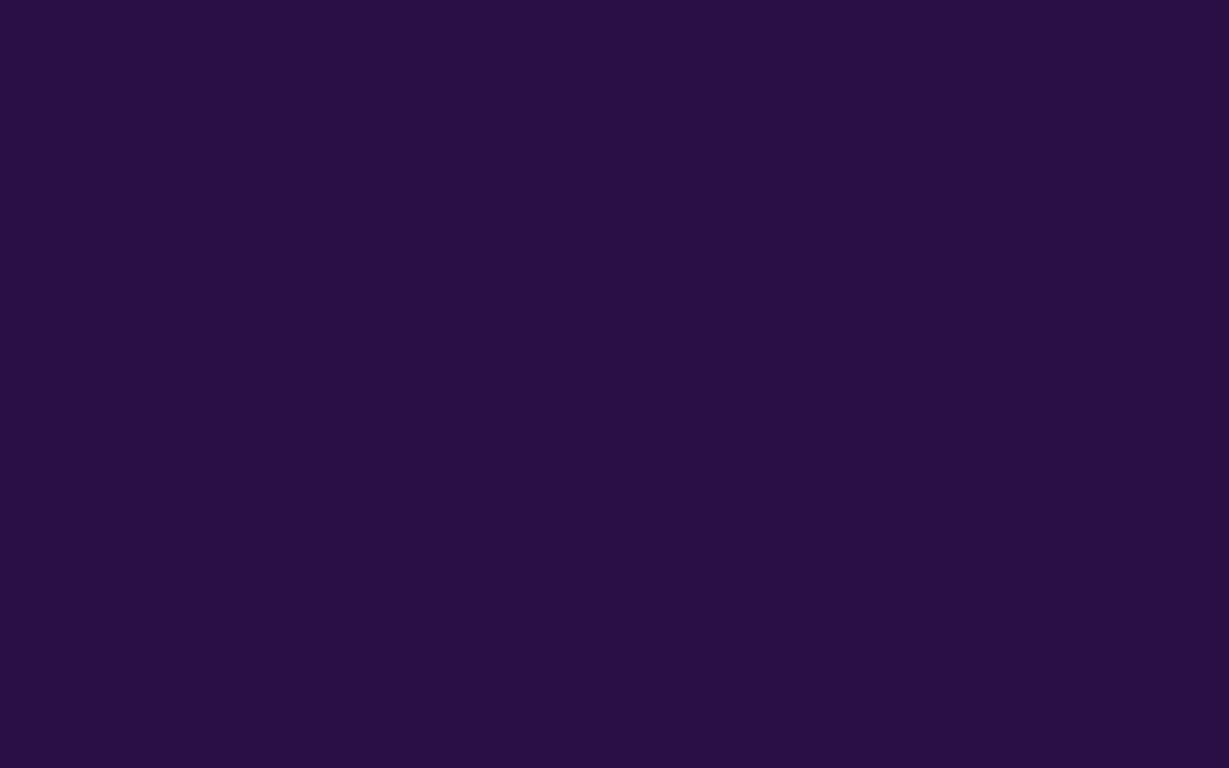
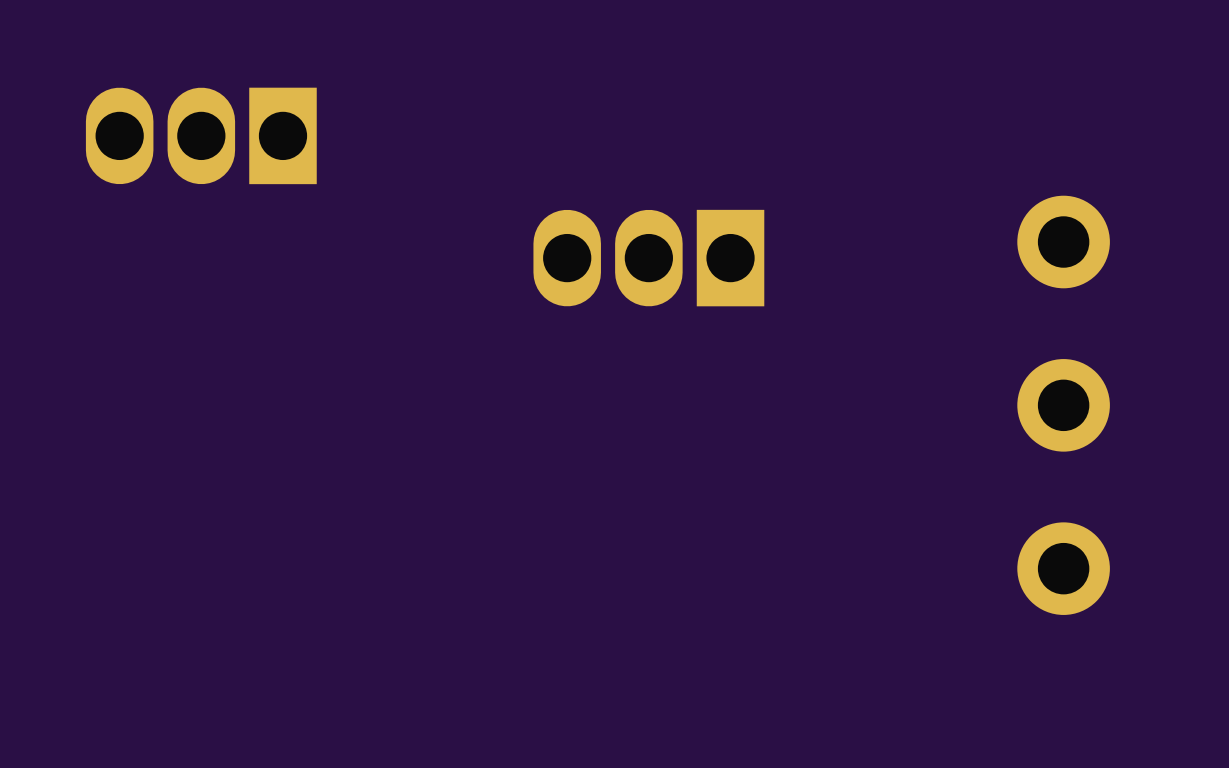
part: none -> (201, 135)
part: none -> (648, 258)
part: none -> (1063, 405)

